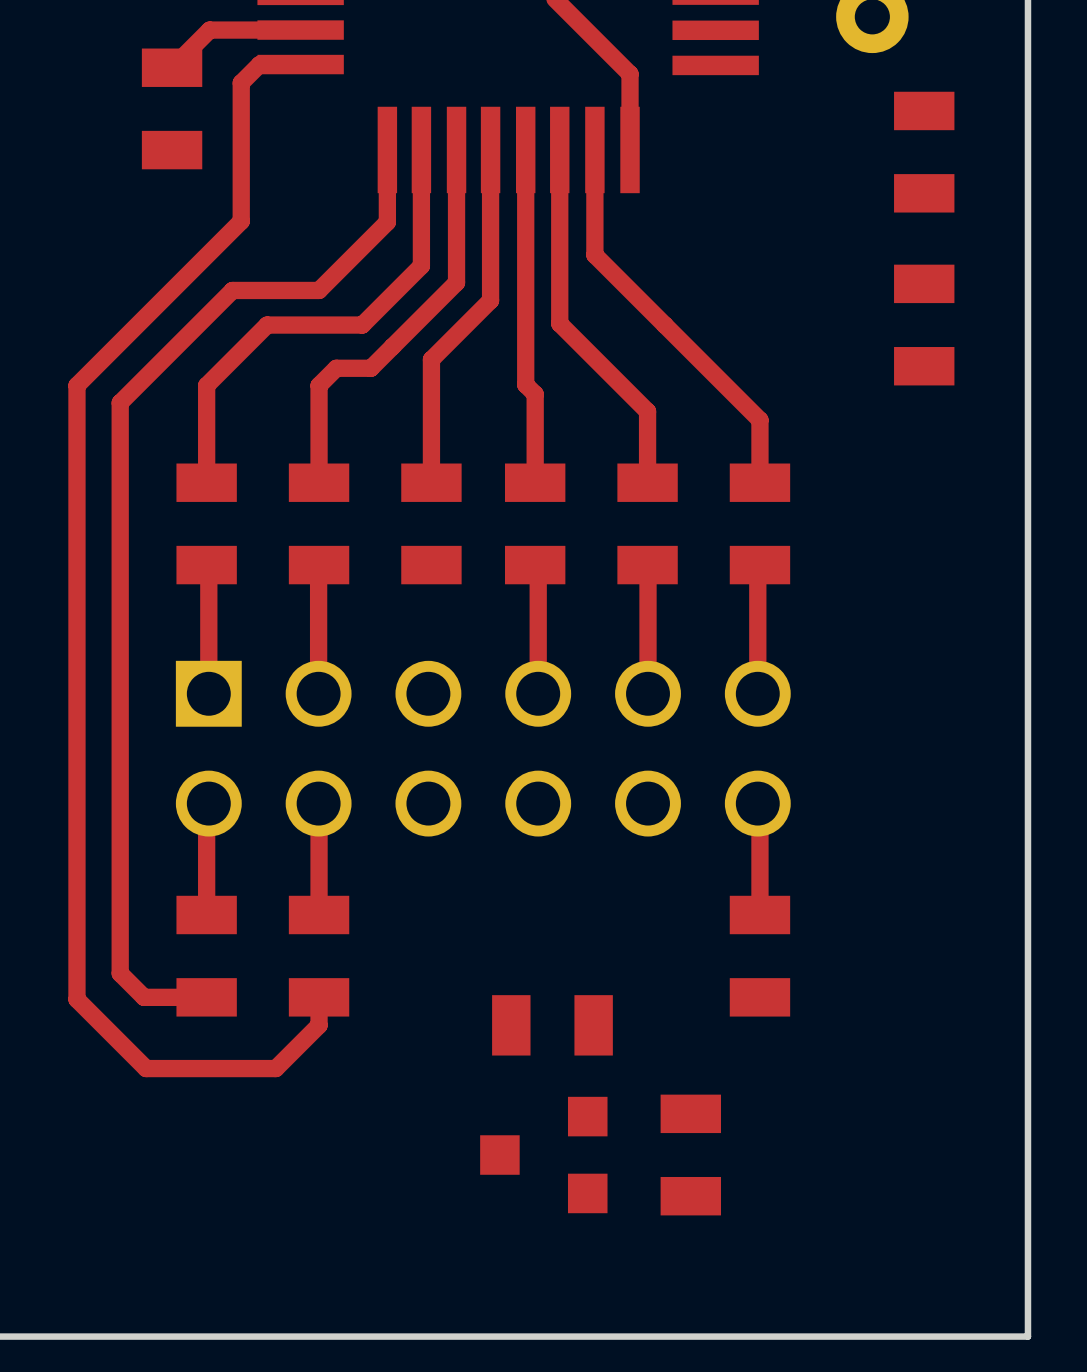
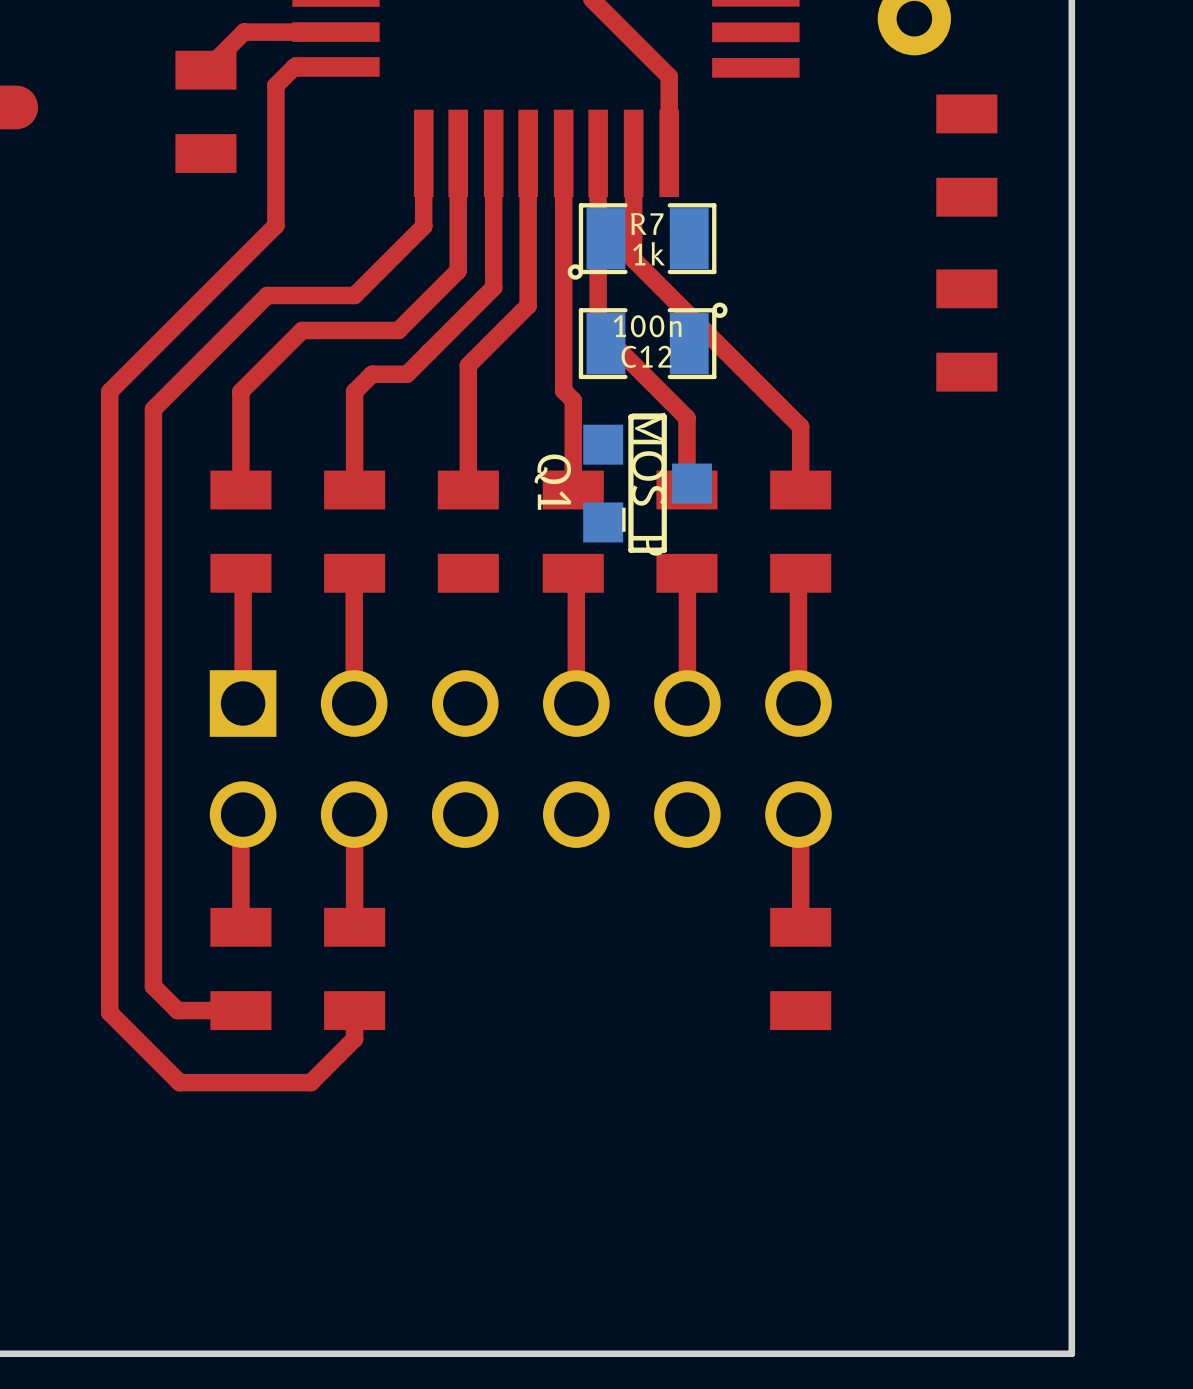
C12 side: top (552, 1025) -> bottom (653, 340)
Q1 side: top (543, 1155) -> bottom (647, 483)
R7 side: top (690, 1155) -> bottom (642, 241)

